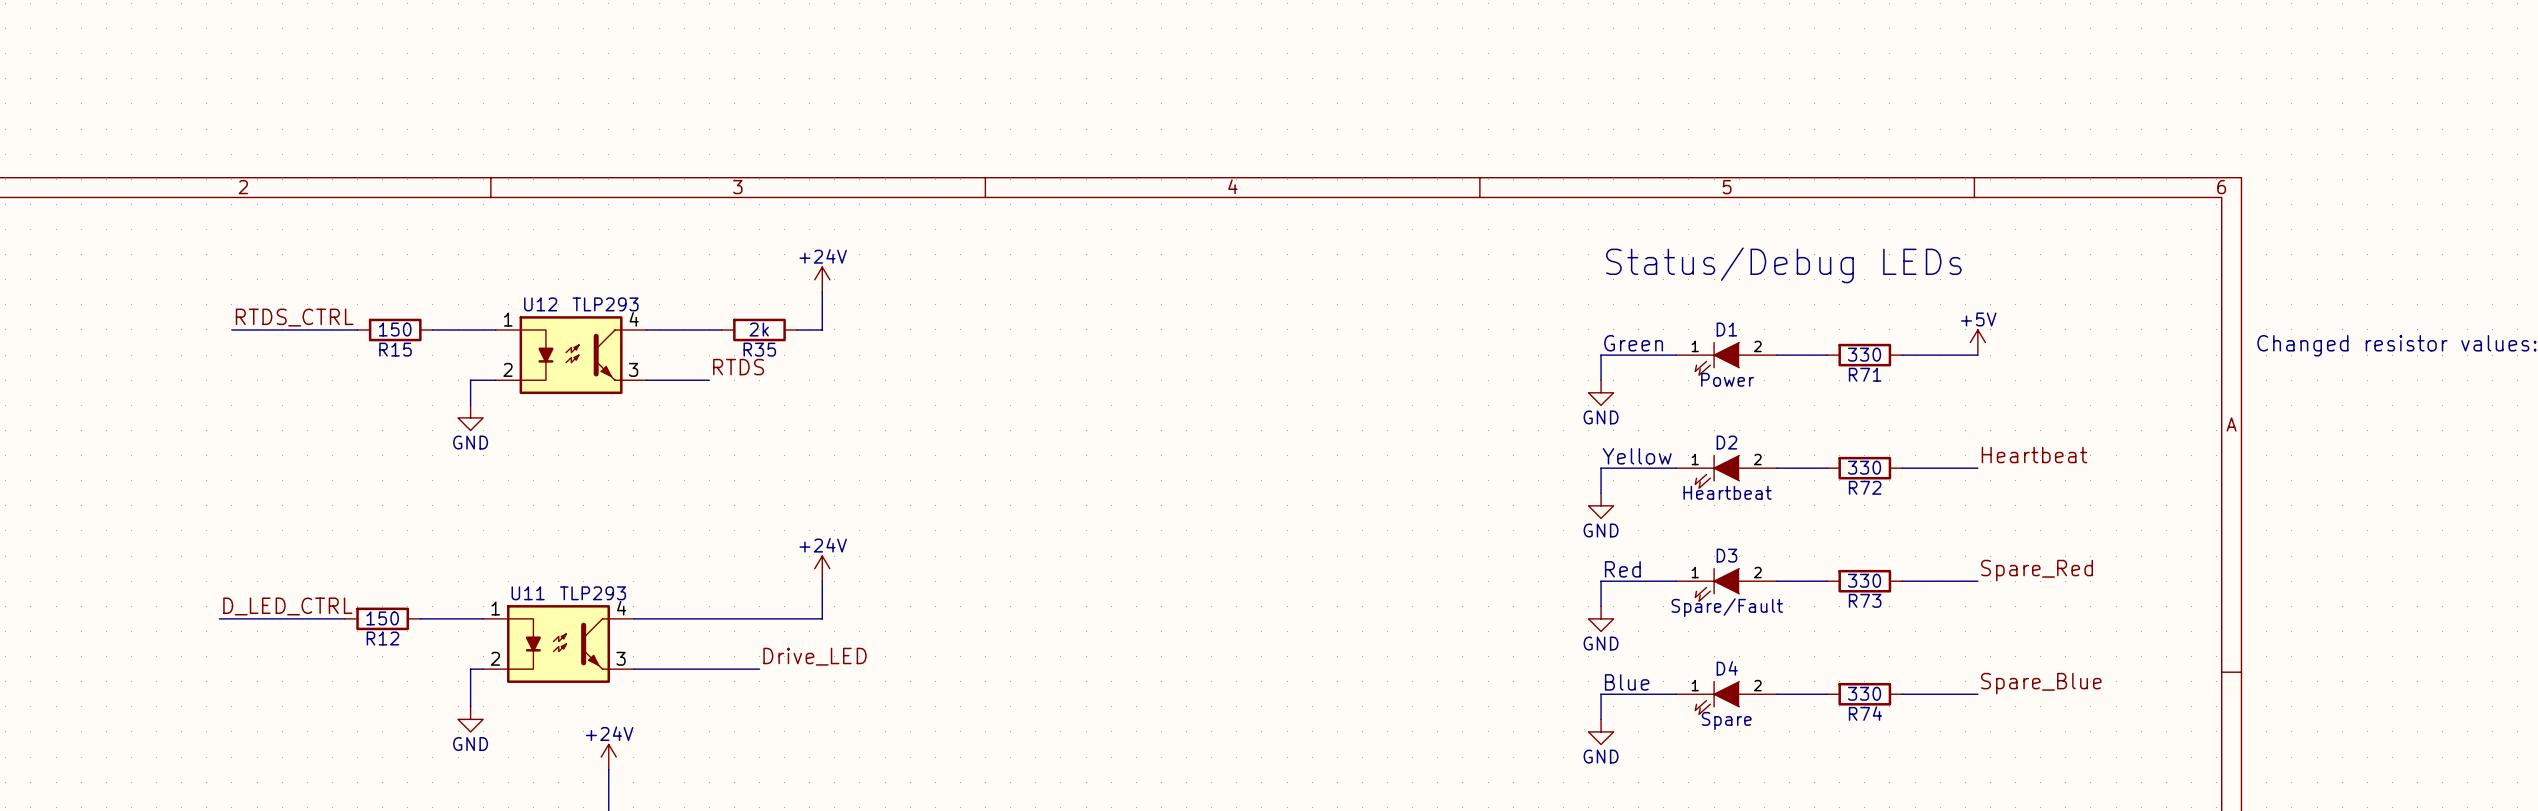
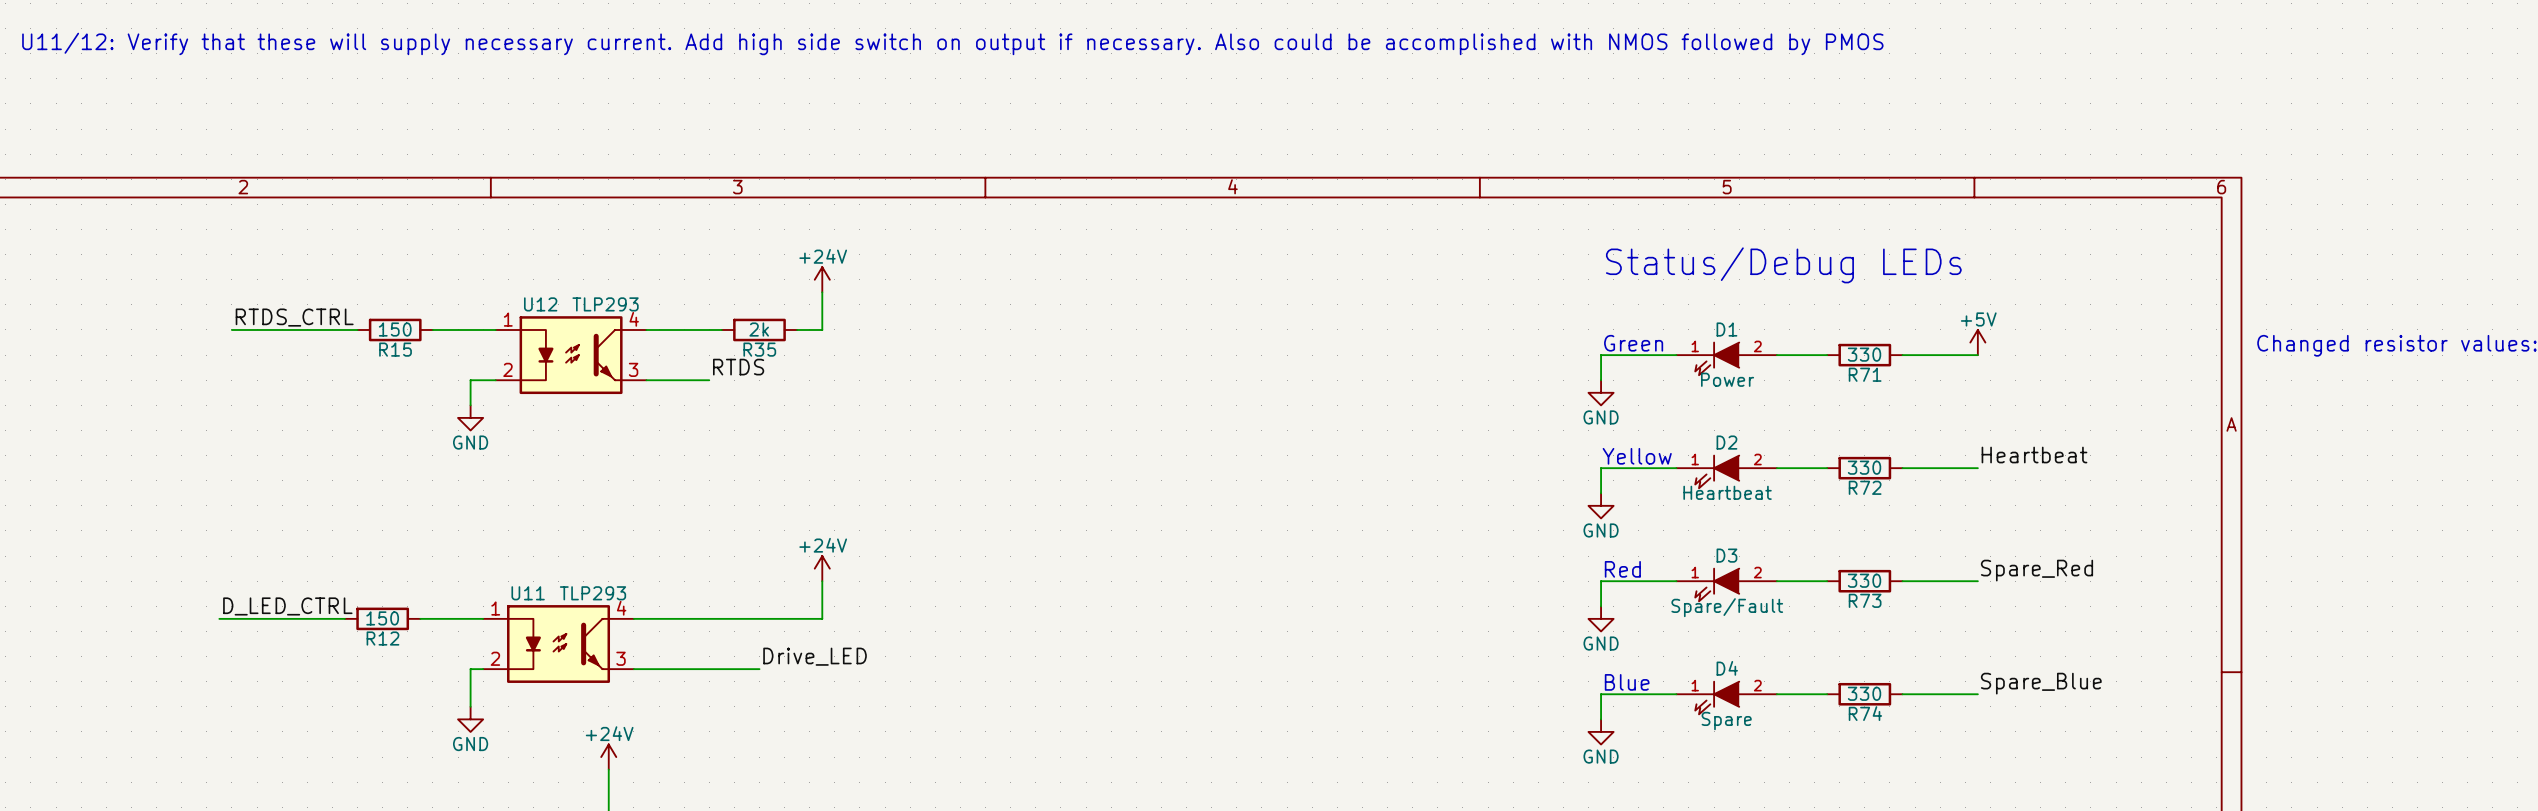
text: none -> U11/12: Verify that these will supply necessary current. Add high side switch on output if necessary. Also could be accomplished with NMOS followed by PMOS (952, 43)

